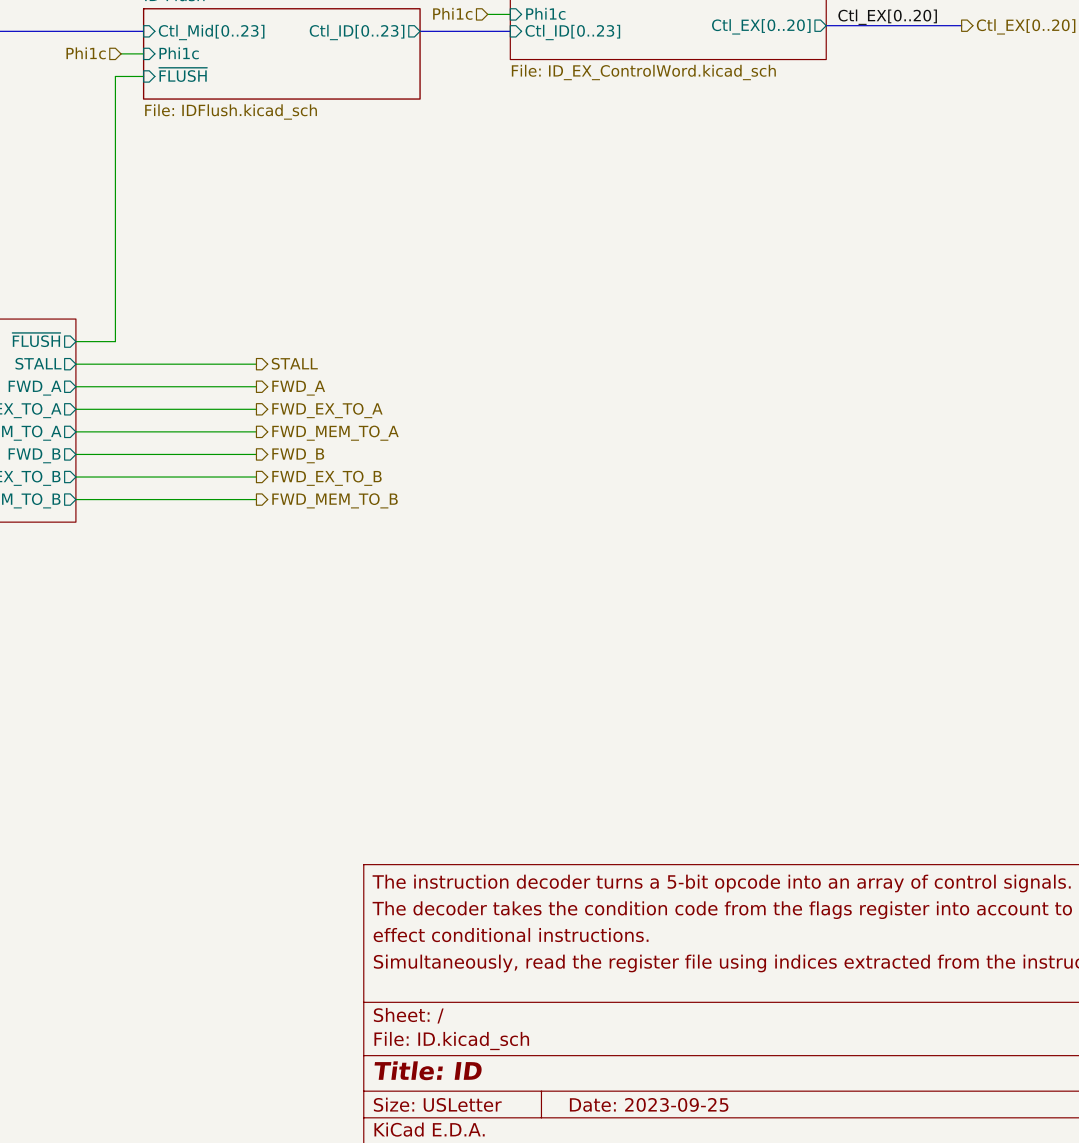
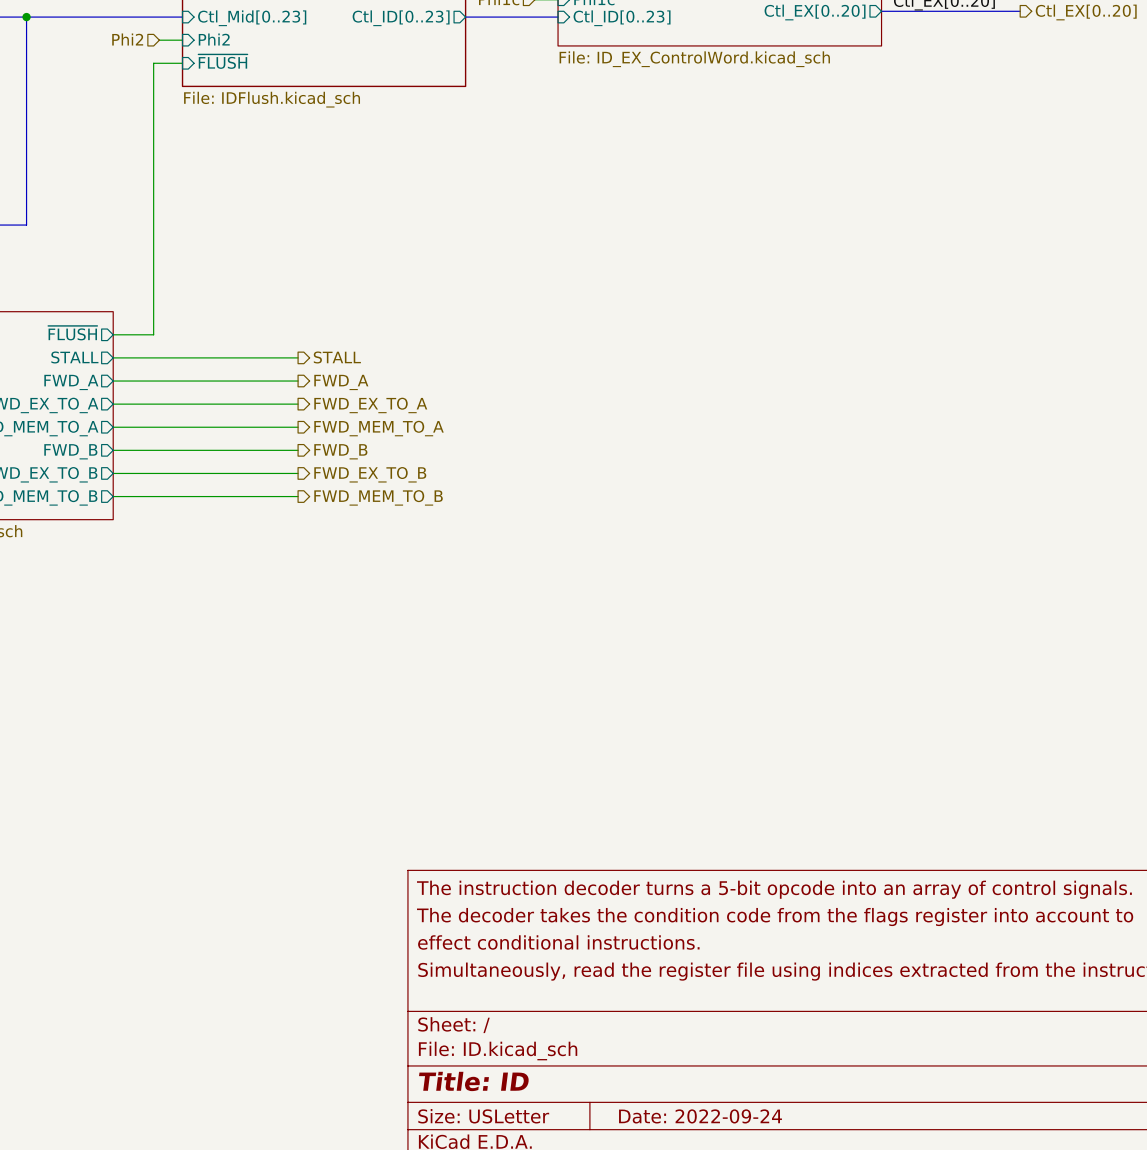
hierarchical label: Phi1c (86, 53) -> Phi2 (127, 39)
sheet pin: Phi1c (179, 53) -> Phi2 (214, 39)
title block: Date: 2023-09-25 (649, 1104) -> Date: 2022-09-24 (700, 1116)

